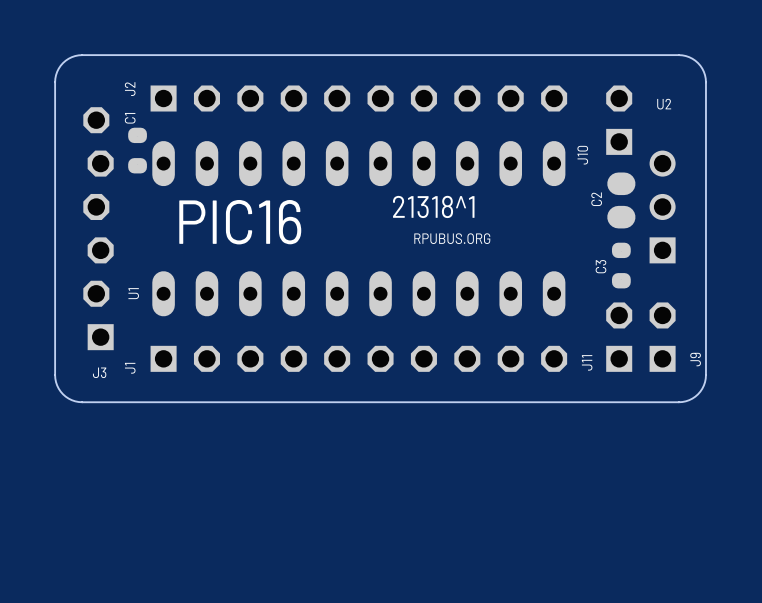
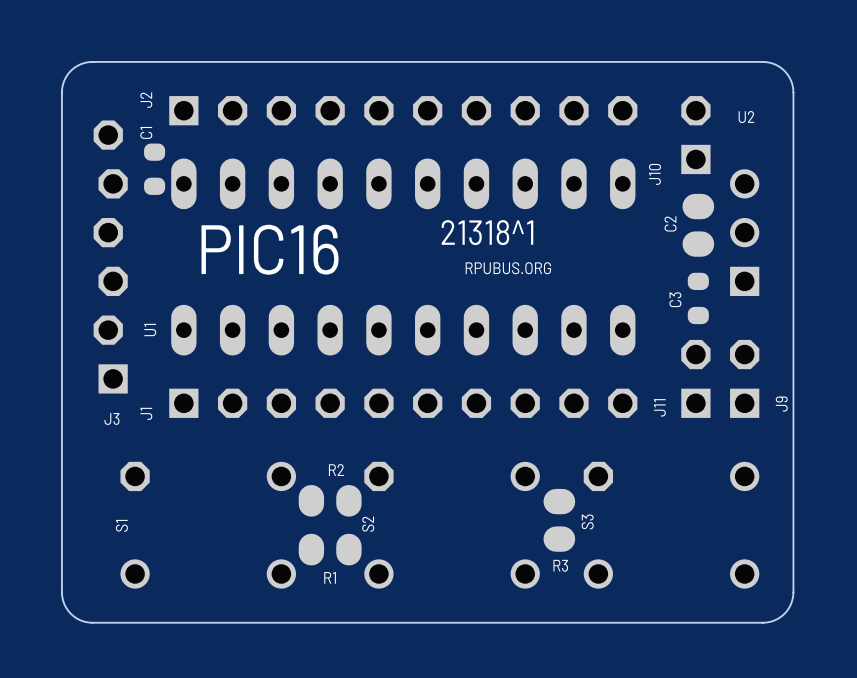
board edge: (55, 375) (57, 385) (63, 394) (71, 400) (82, 402) (678, 402) (689, 400) (698, 394) (703, 385) (705, 375) -> (61, 421) (62, 596) (66, 607) (73, 616) (80, 620) (92, 622) (770, 621) (778, 618) (787, 610) (793, 596) (793, 421)
R2: none -> (330, 500)
R3: none -> (559, 520)
S1: none -> (208, 525)
S2: none -> (452, 525)
S3: none -> (671, 525)
R1: none -> (330, 549)

